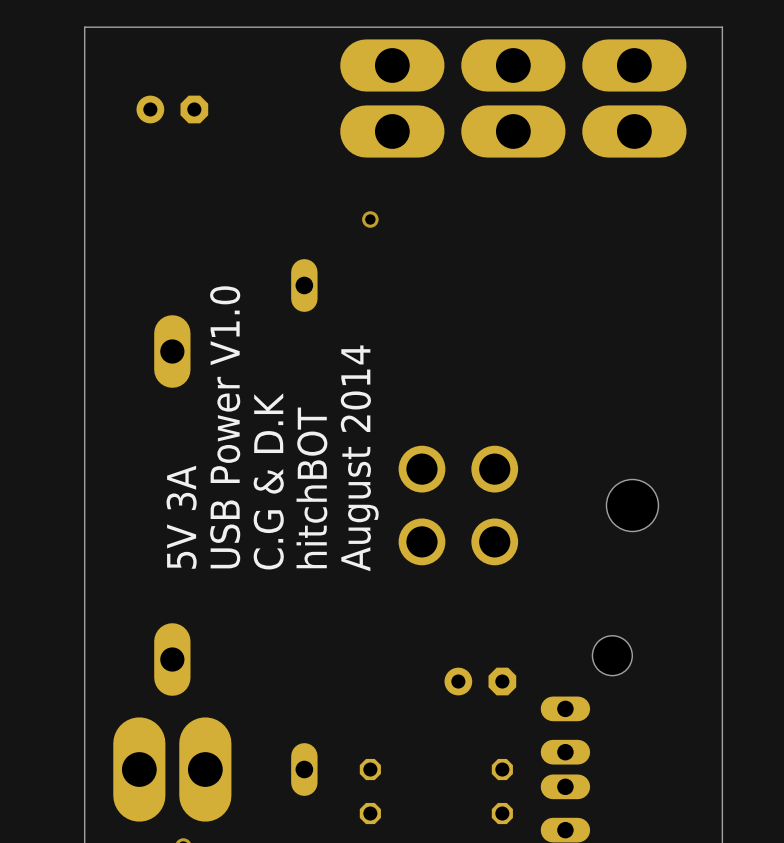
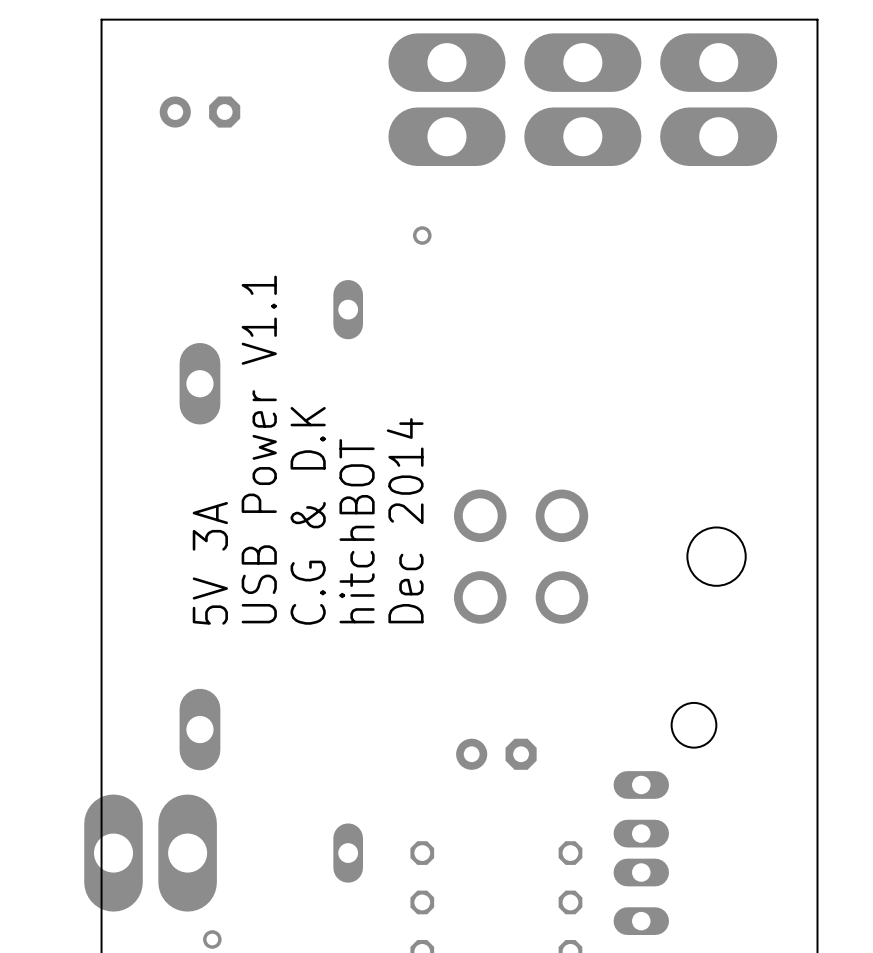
text: USB Power V1.0 (225, 427) -> USB Power V1.1 (259, 449)
text: August 2014 (359, 458) -> Dec 2014 (405, 520)
part position: (480, 681) -> (496, 754)
part position: (172, 769) -> (150, 853)

